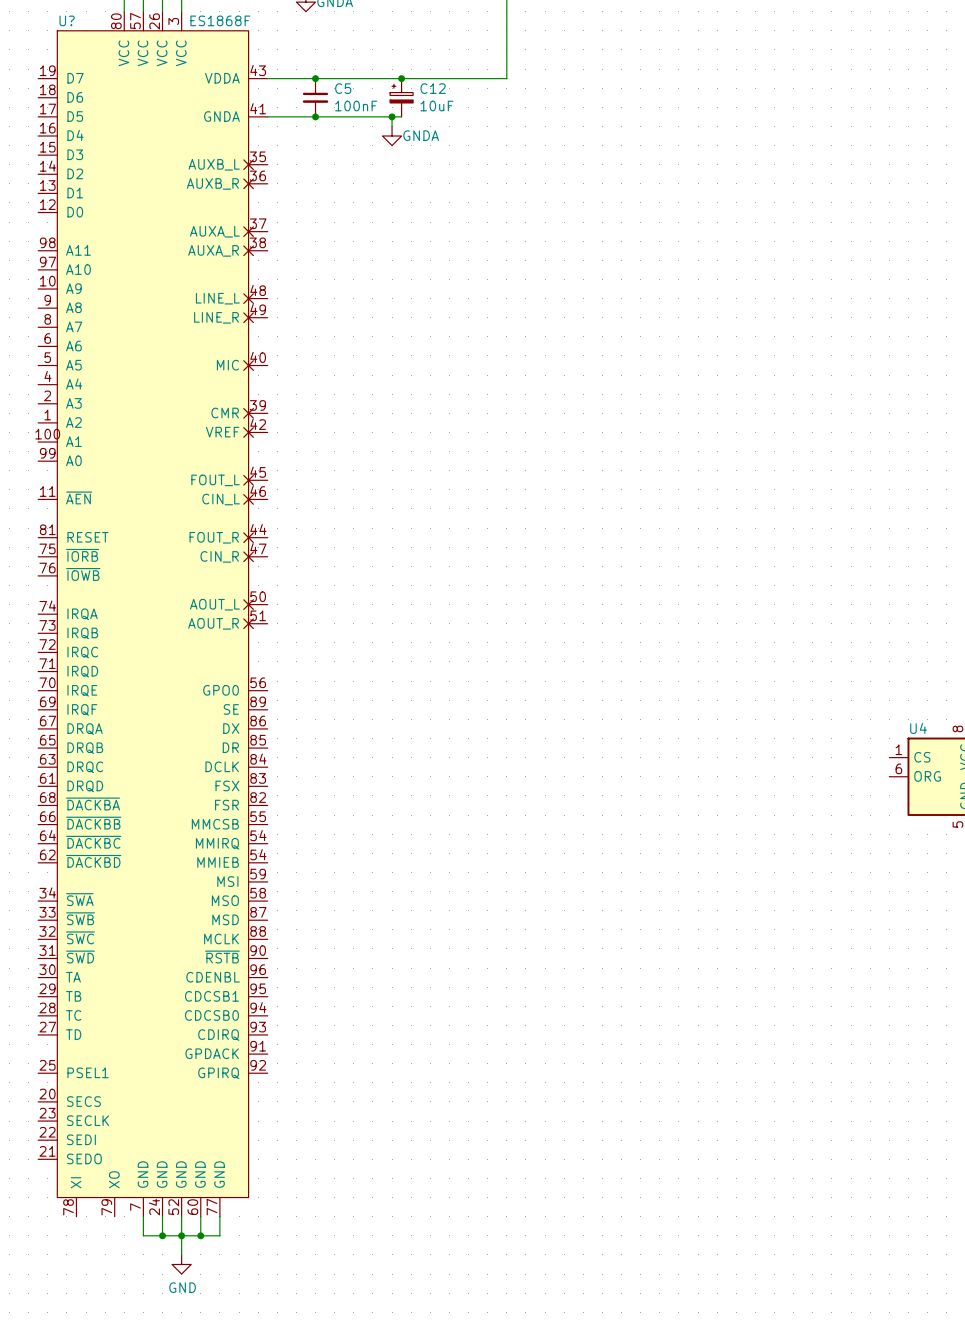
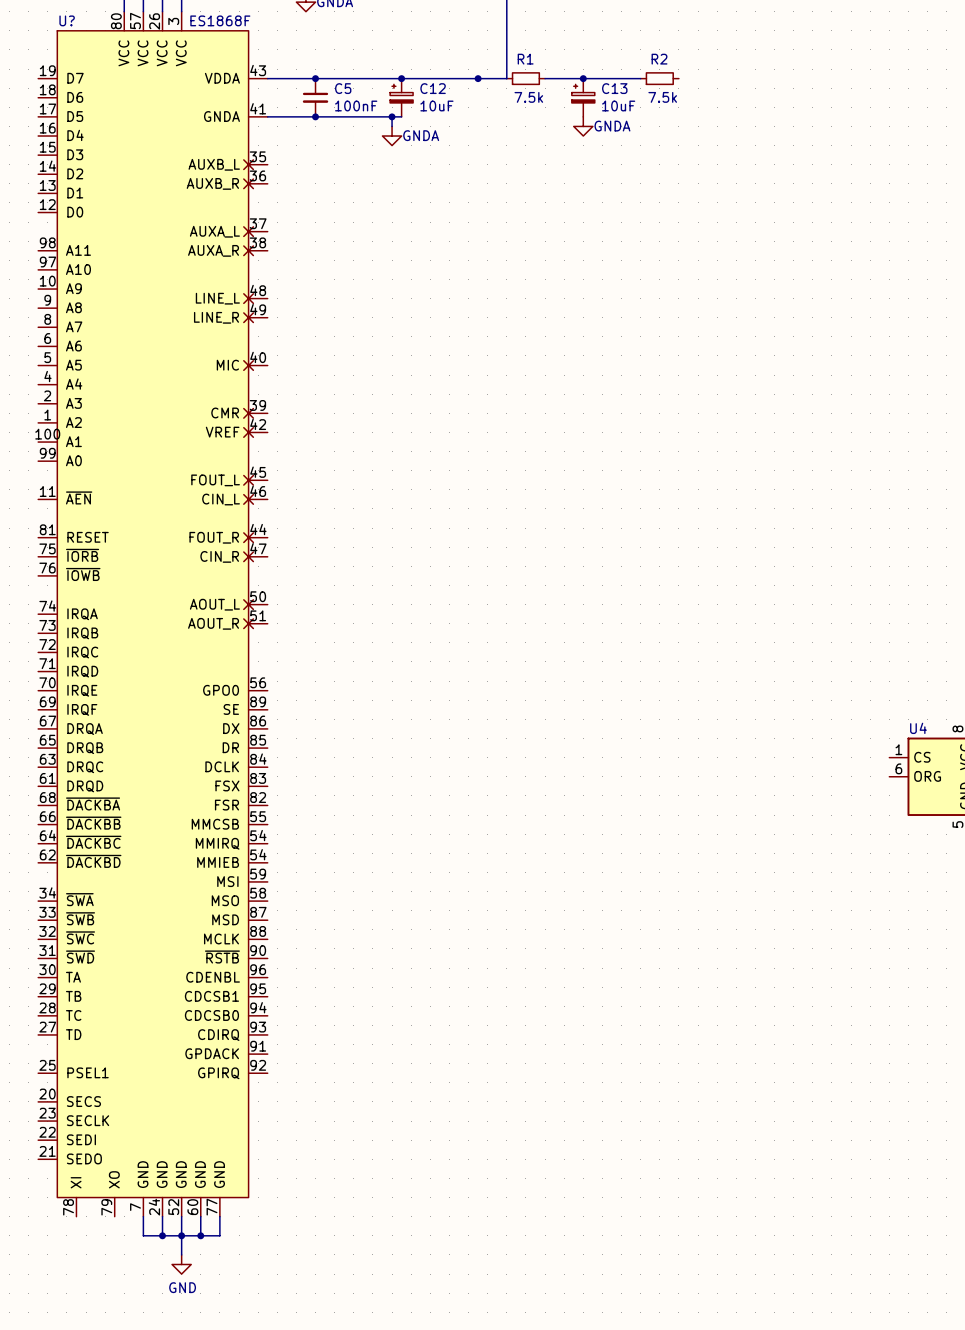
junction: none -> (478, 78)
R1: none -> 7.5k (525, 78)
wire: none -> (545, 78) (640, 78)
junction: none -> (583, 78)
R2: none -> 7.5k (659, 78)
C13: none -> 10uF (583, 97)
power symbol: none -> GNDA (583, 126)

